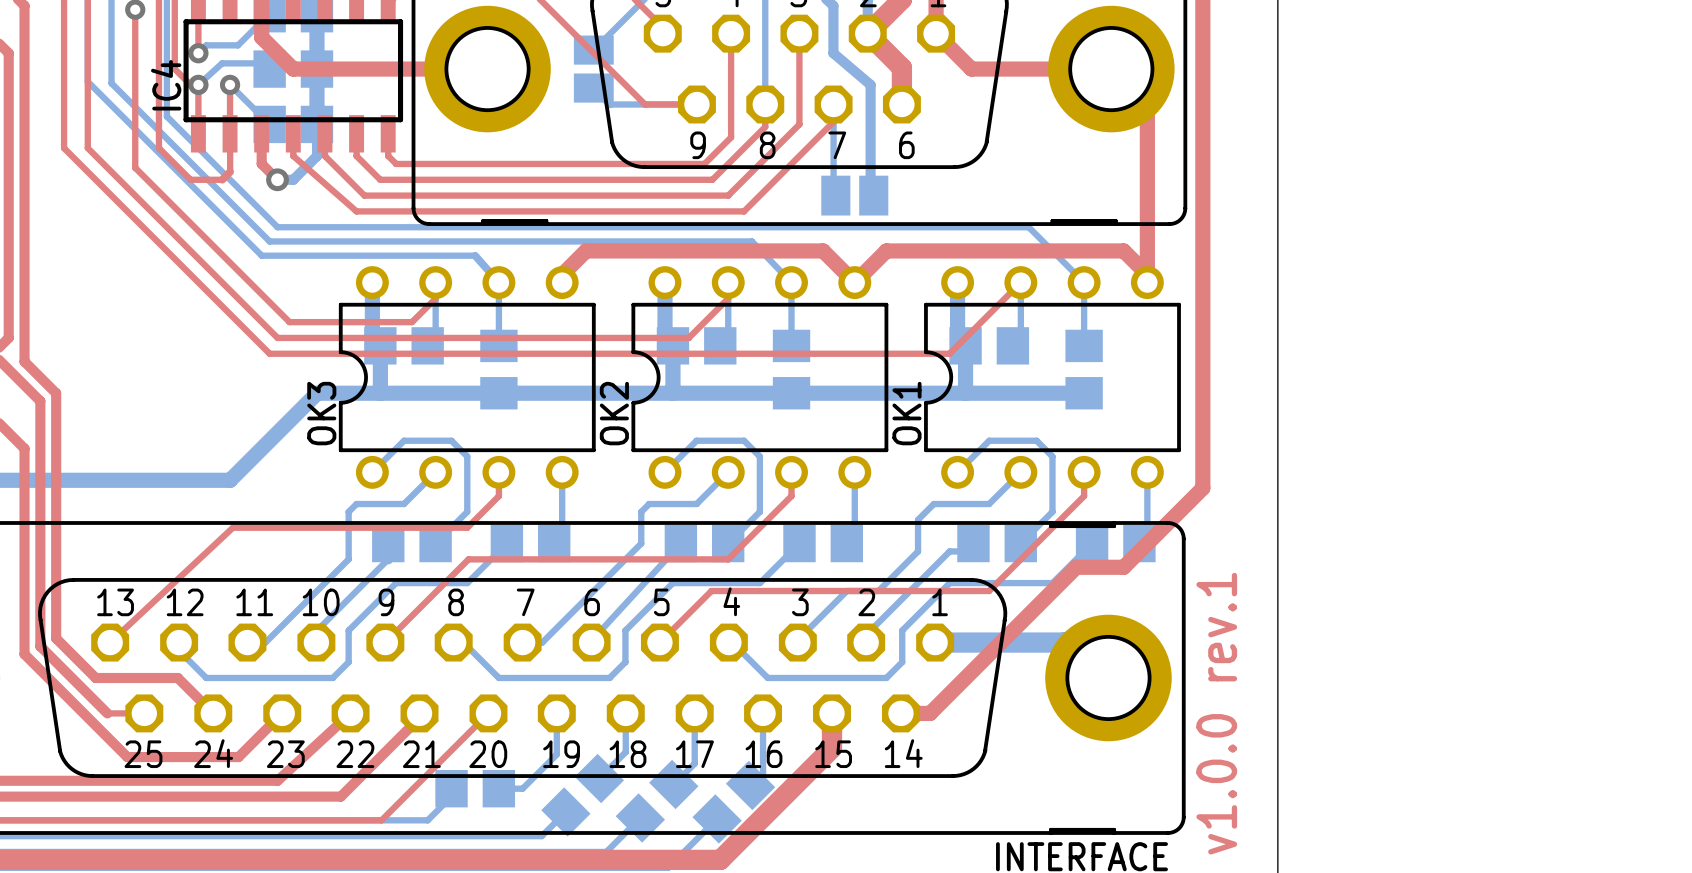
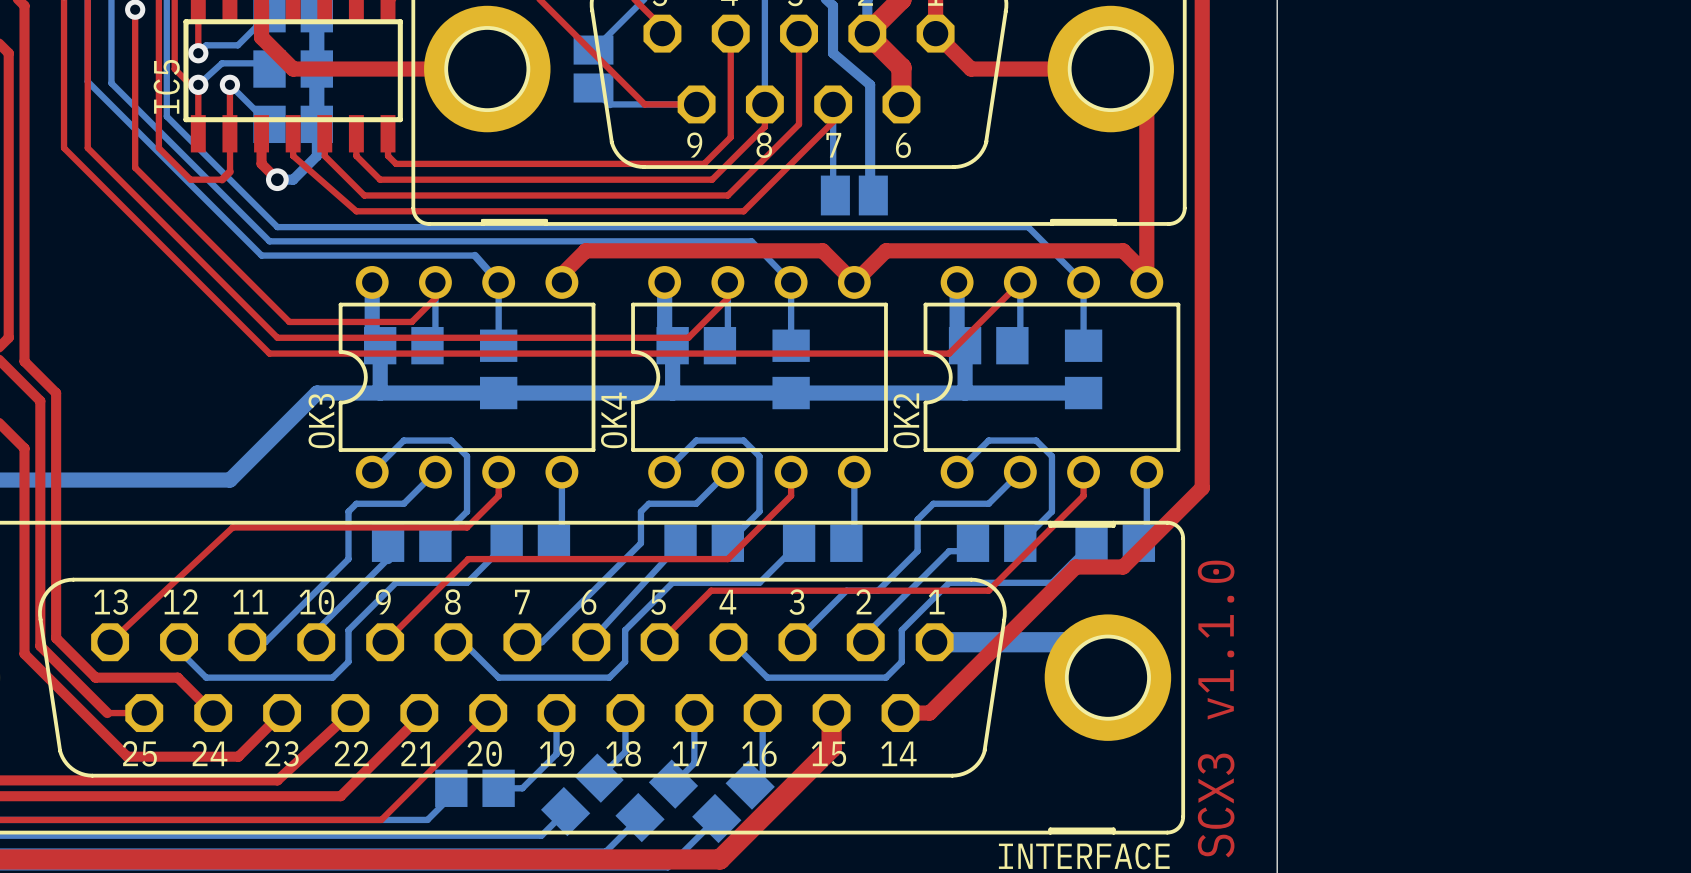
IC4 name: IC4 (166, 85) -> IC5 (166, 86)
OK2 name: OK2 (614, 413) -> OK4 (614, 420)
OK1 name: OK1 (906, 413) -> OK2 (906, 420)
text: v1.0.0 rev.1 (1216, 713) -> SCX3 v1.1.0 (1216, 709)

